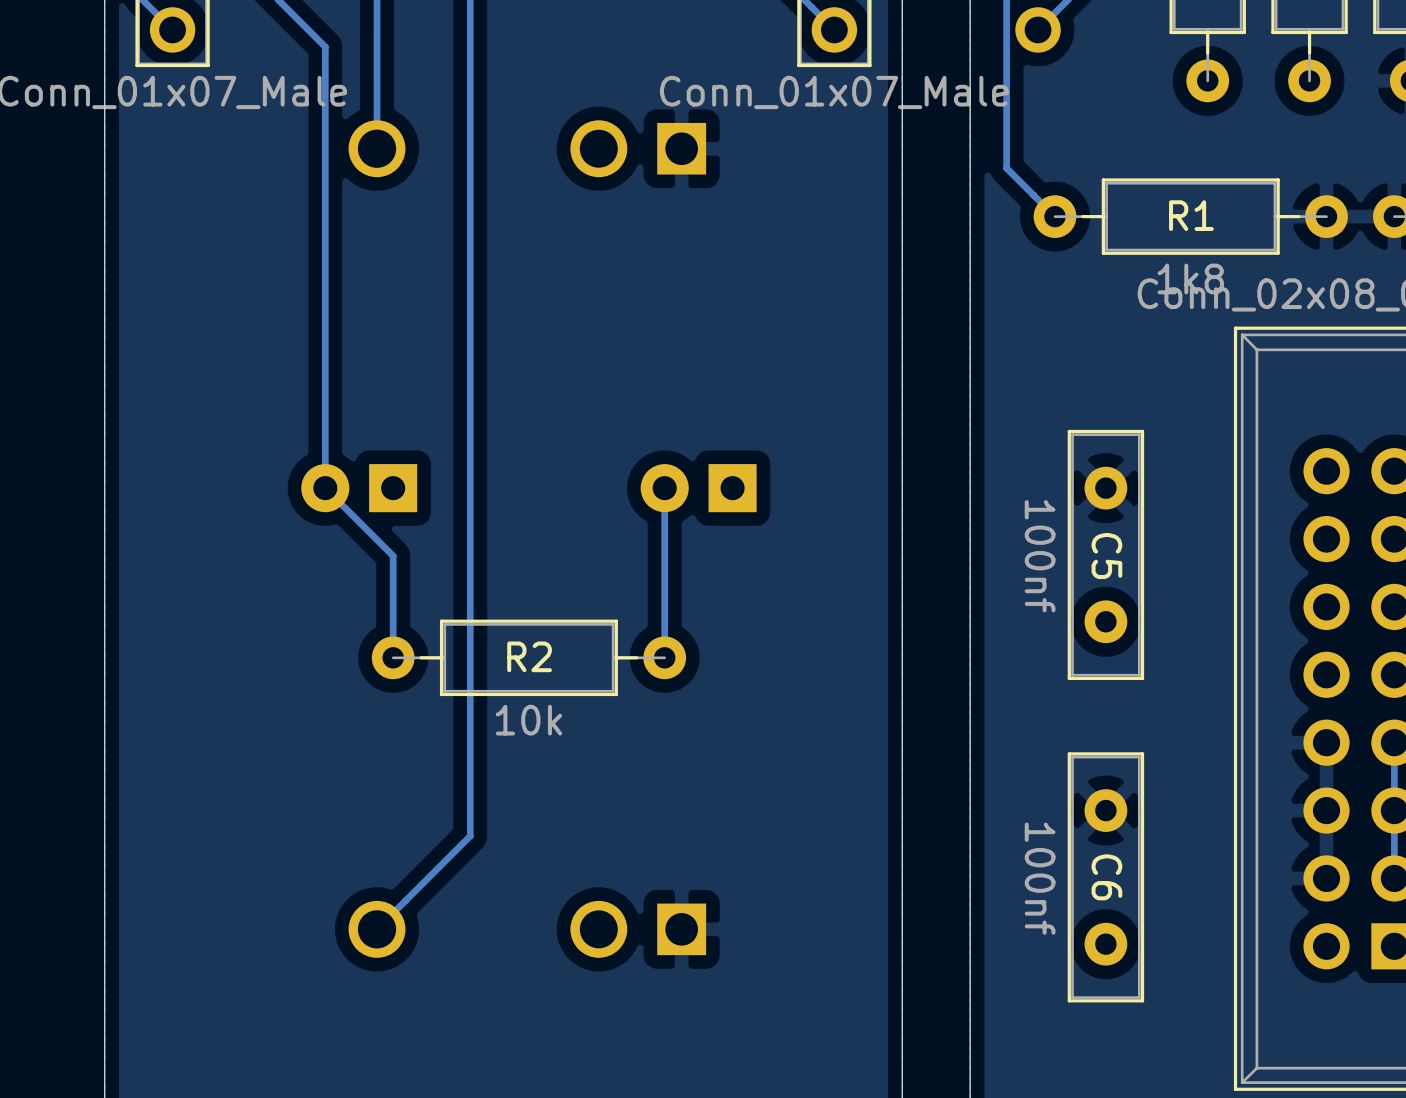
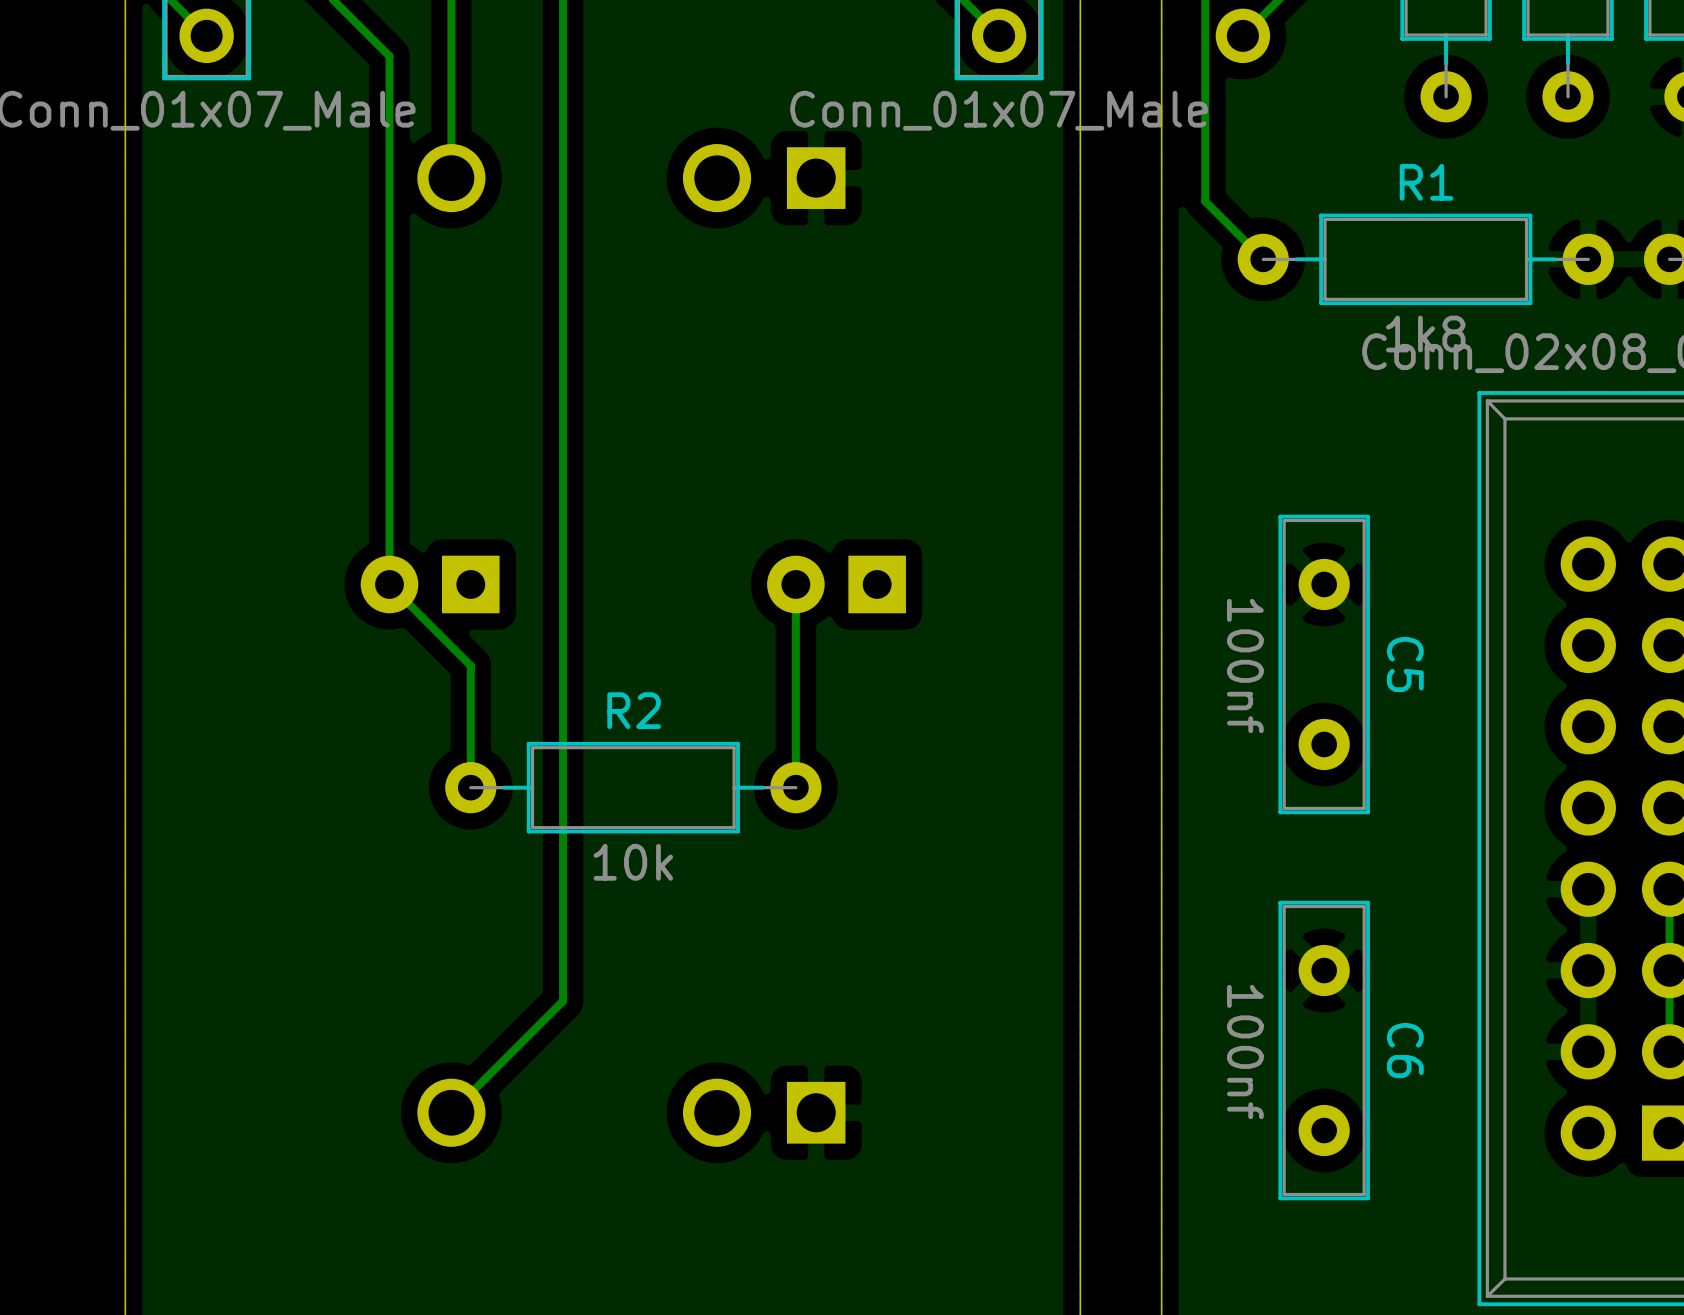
R1 name position: R1 (1191, 215) -> R1 (1426, 182)
C5 name position: C5 (1106, 556) -> C5 (1405, 664)
R2 name position: R2 (529, 656) -> R2 (634, 710)
C6 name position: C6 (1106, 877) -> C6 (1405, 1050)

